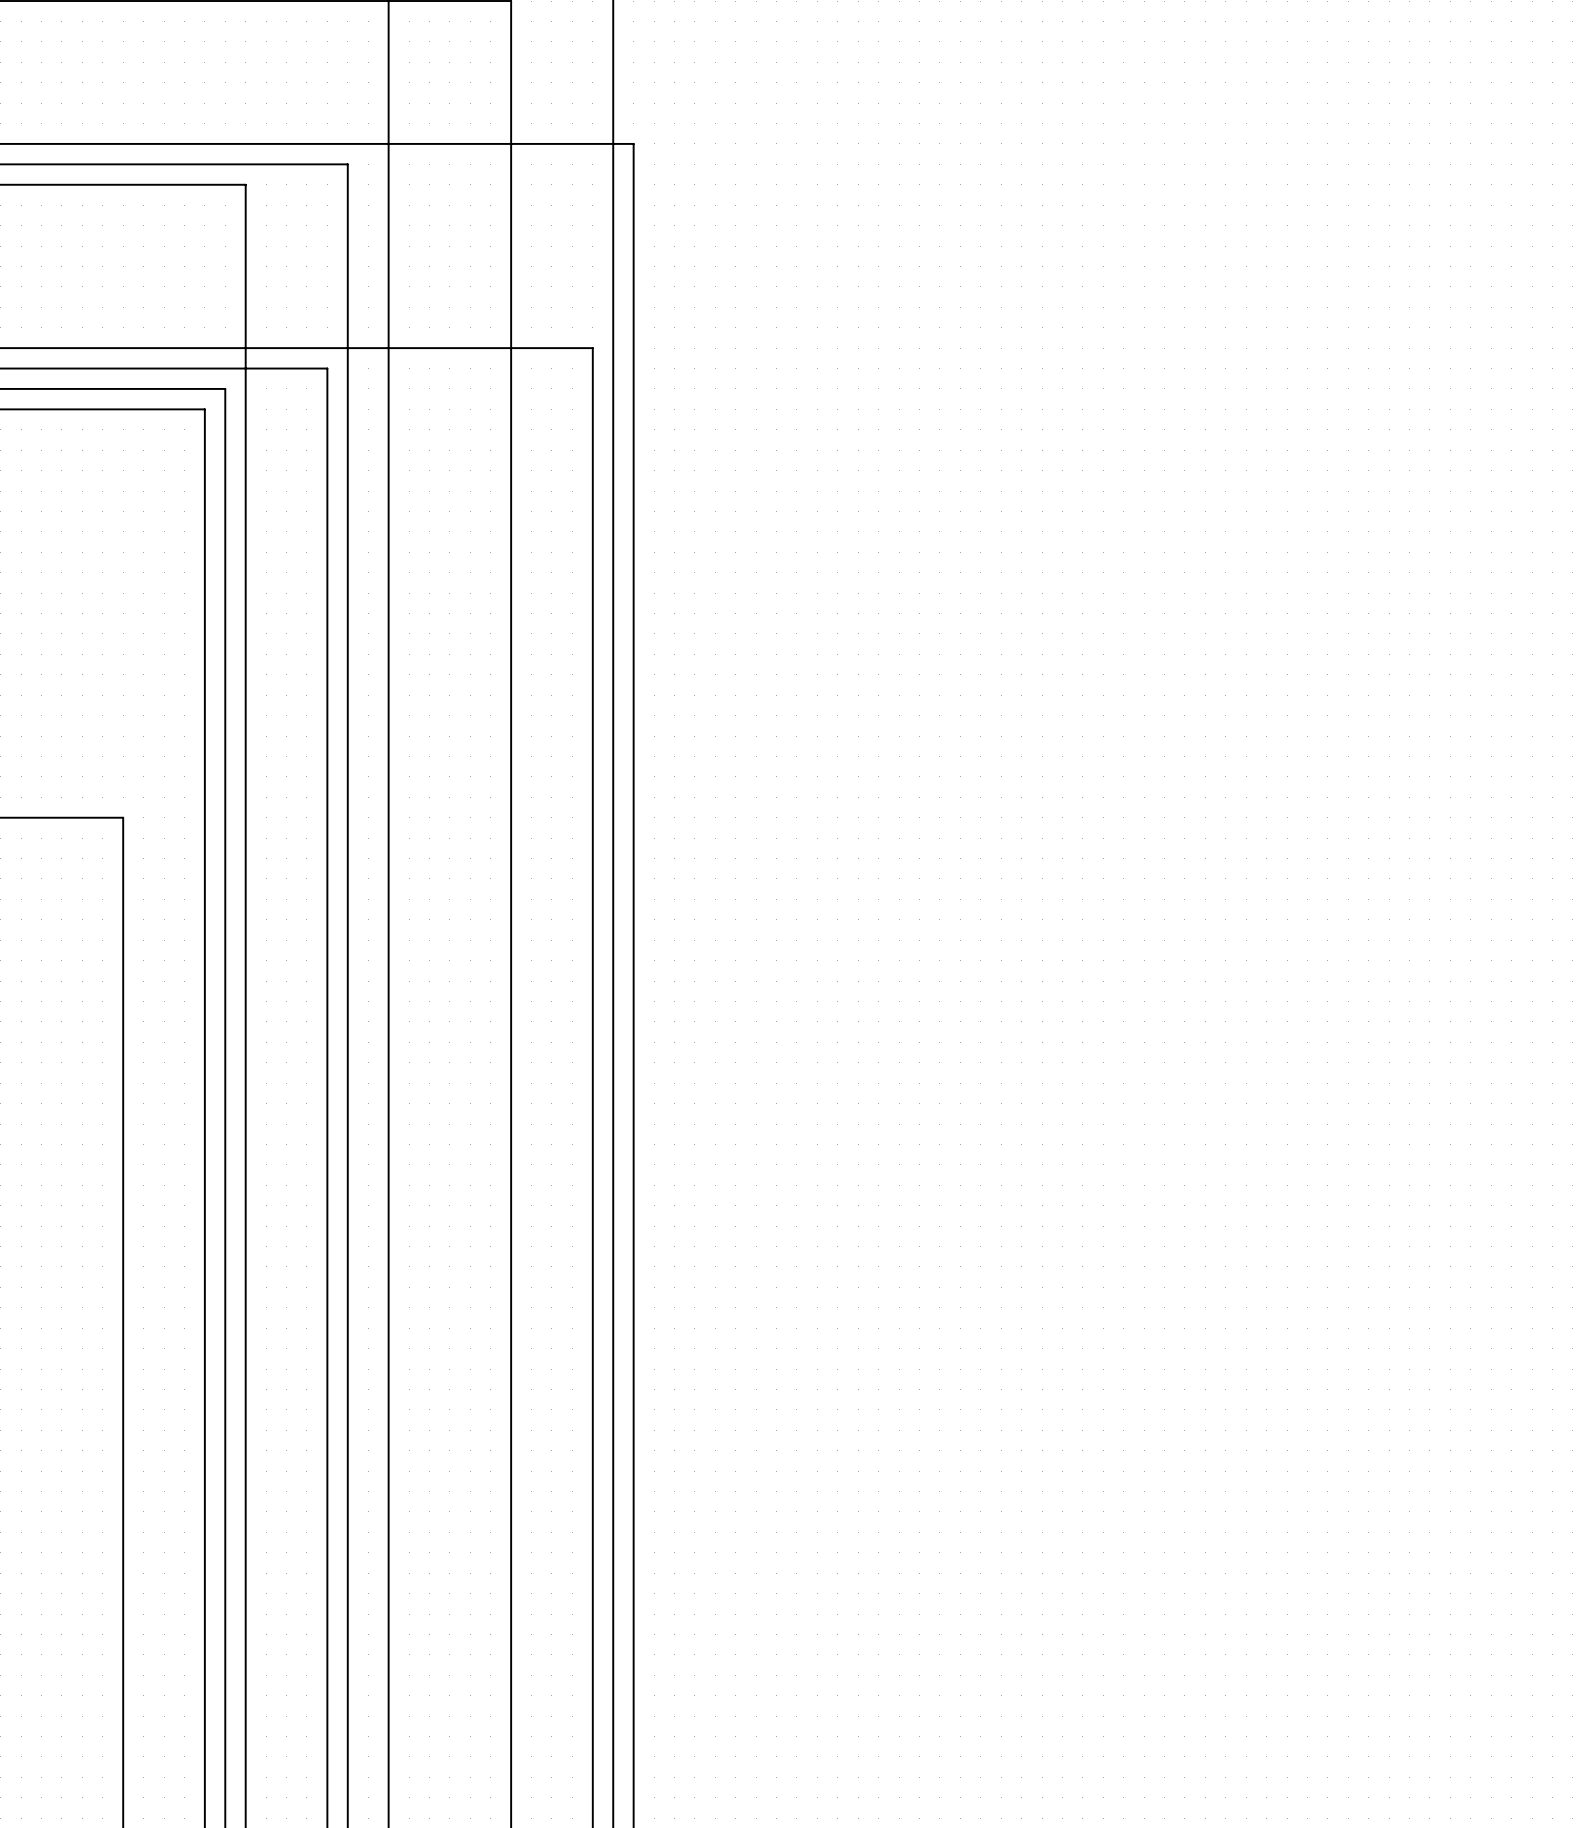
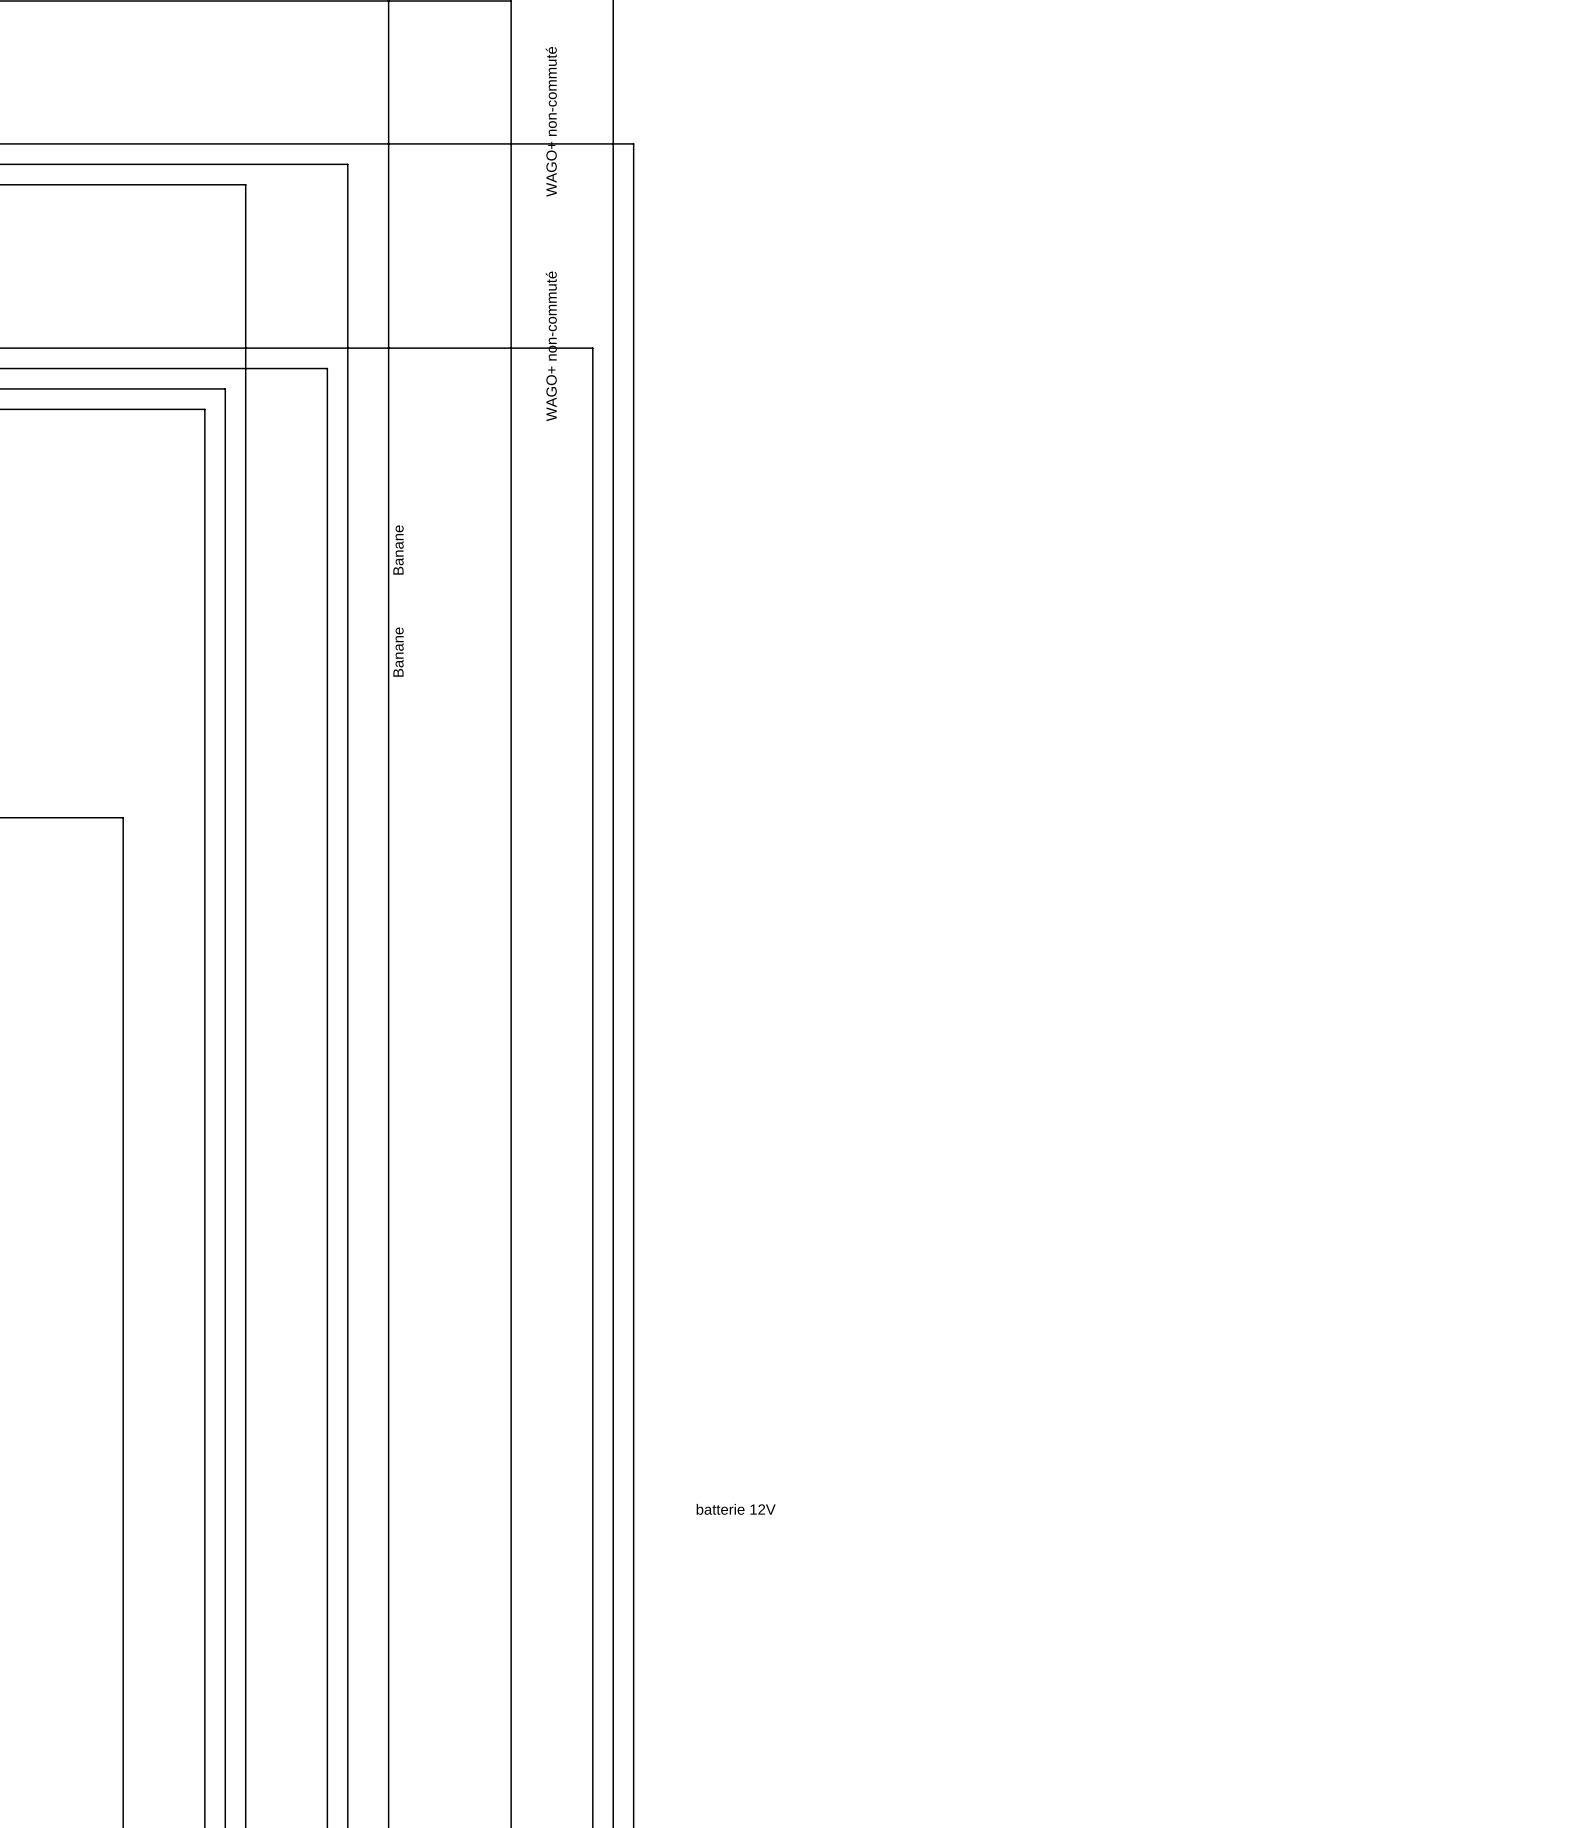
text: none -> WAGO+ non-commuté (551, 121)
text: none -> WAGO+ non-commuté (551, 346)
text: none -> Banane (398, 550)
text: none -> Banane (398, 652)
text: none -> batterie 12V (736, 1509)

